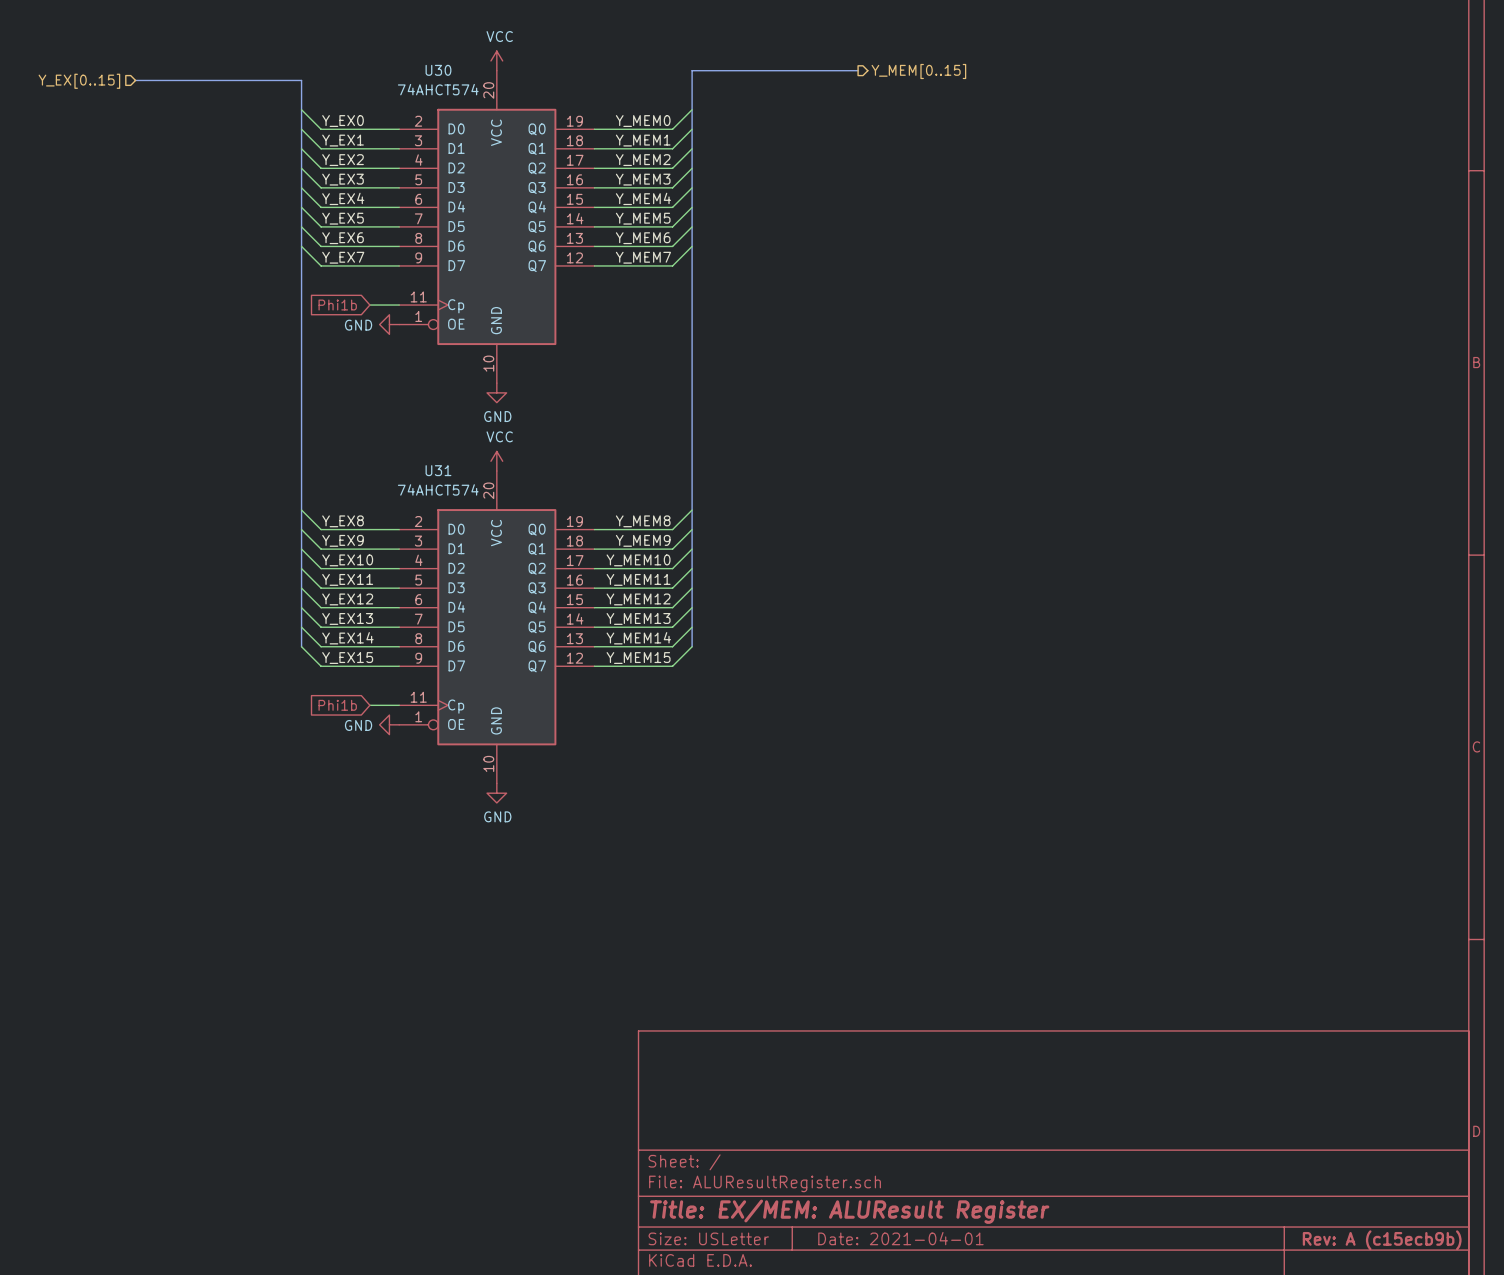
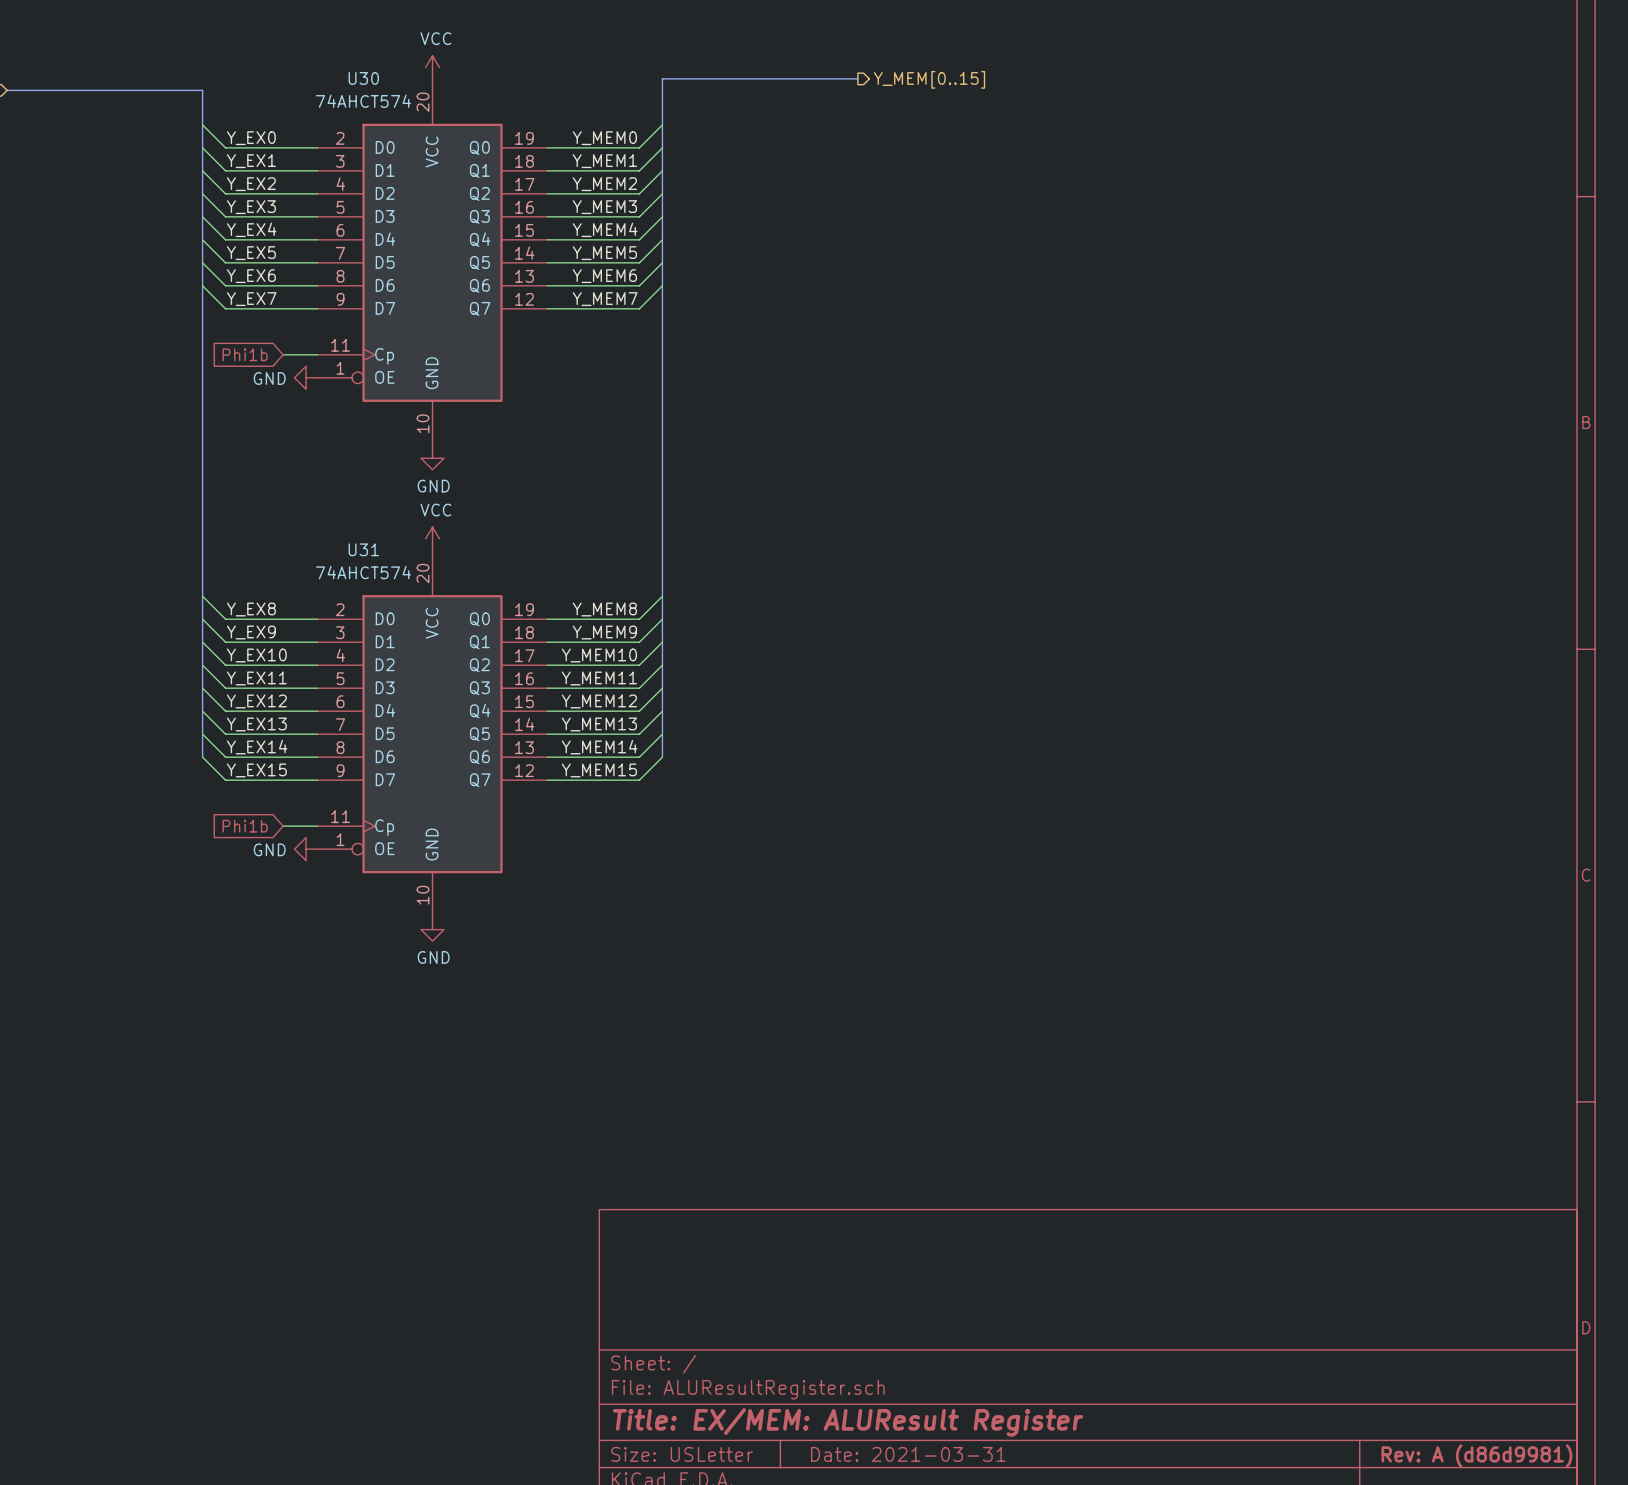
title block: Date: 2021-04-01 (900, 1238) -> Date: 2021-03-31 (908, 1454)
title block: Rev: A (c15ecb9b) (1382, 1240) -> Rev: A (d86d9981) (1476, 1456)

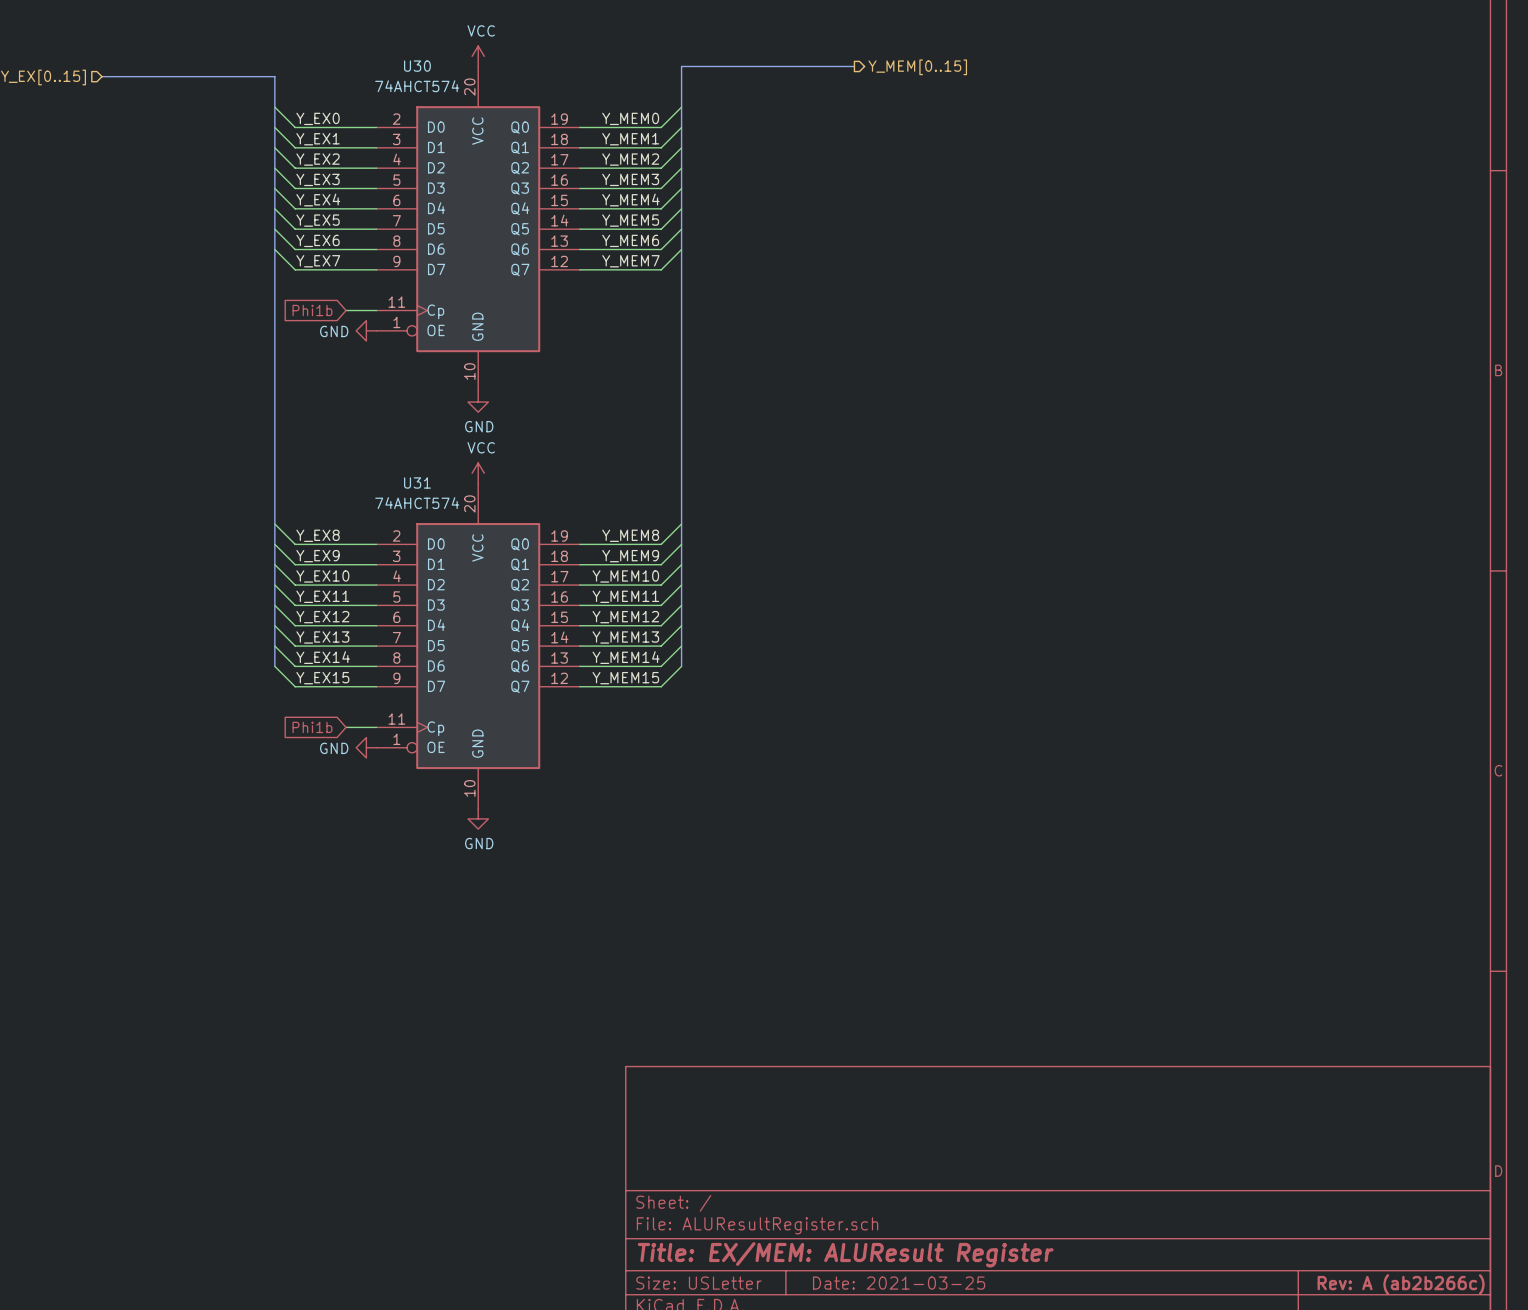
title block: Date: 2021-03-31 (908, 1454) -> Date: 2021-03-25 (899, 1283)
title block: Rev: A (d86d9981) (1476, 1456) -> Rev: A (ab2b266c) (1401, 1284)

